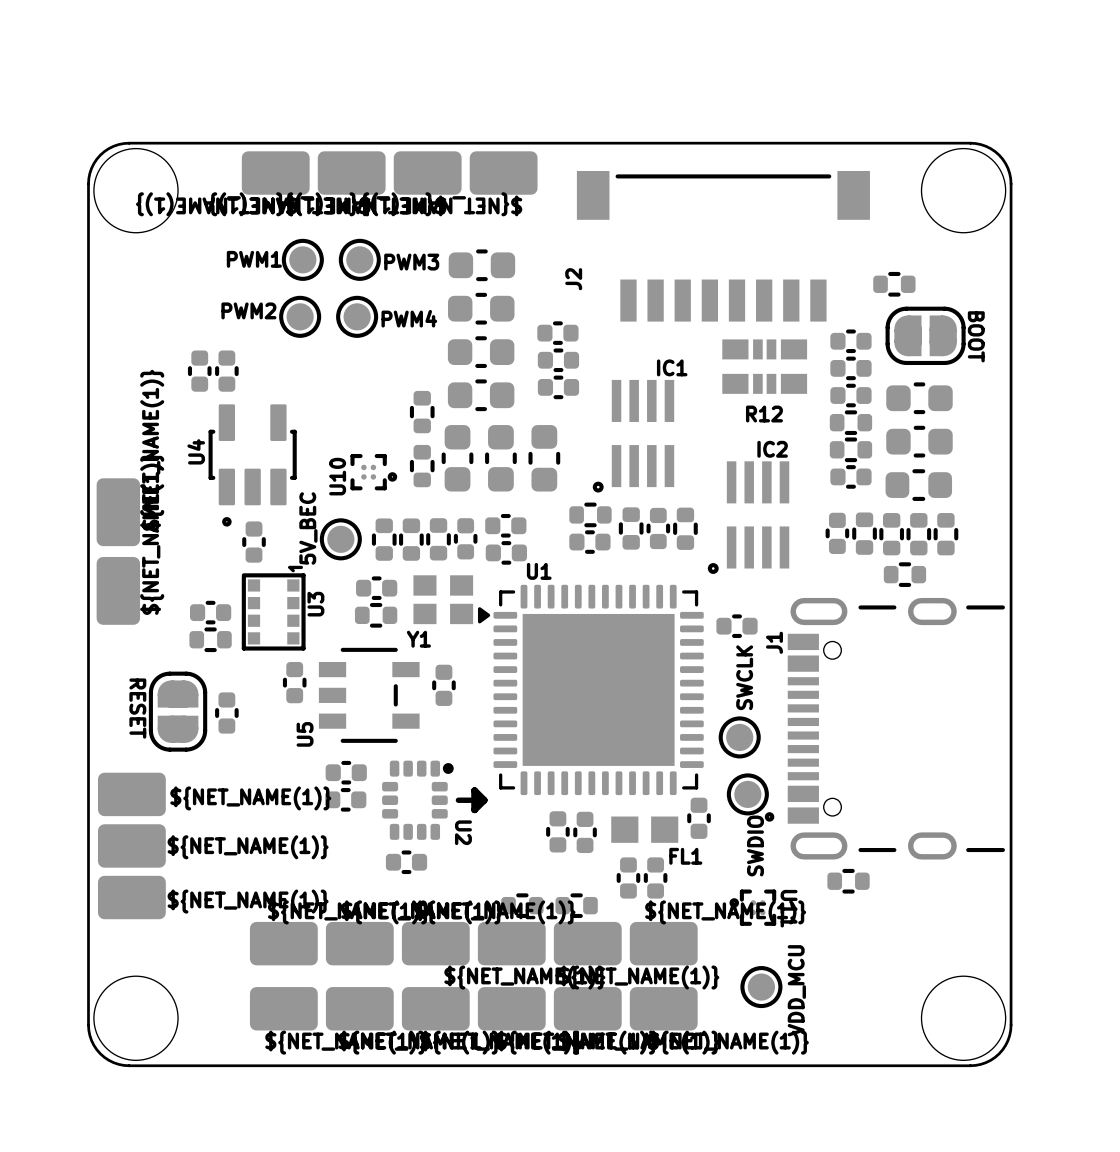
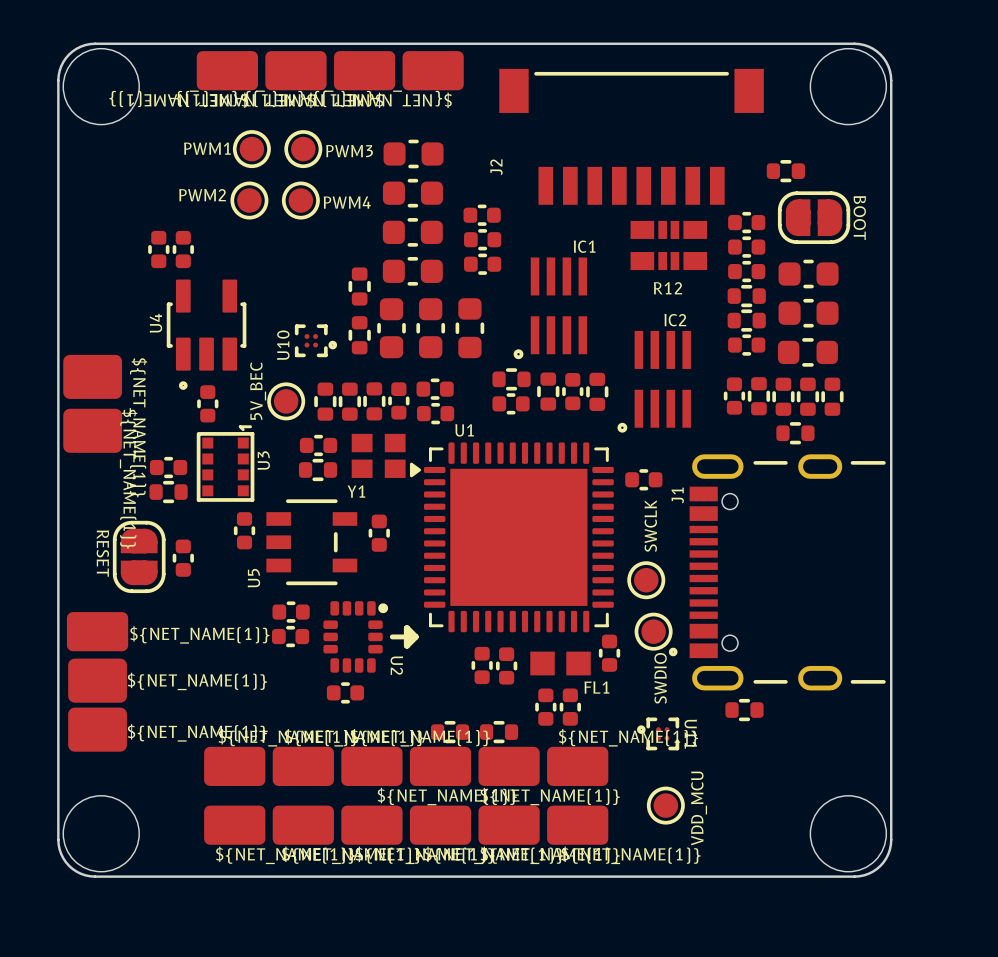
part footprint: [96, 478, 141, 547] -> [63, 354, 123, 399]
part footprint: [96, 556, 141, 625] -> [63, 408, 123, 453]
part footprint: [97, 824, 166, 868] -> [68, 658, 127, 703]
part footprint: [97, 875, 166, 920] -> [68, 707, 127, 752]

